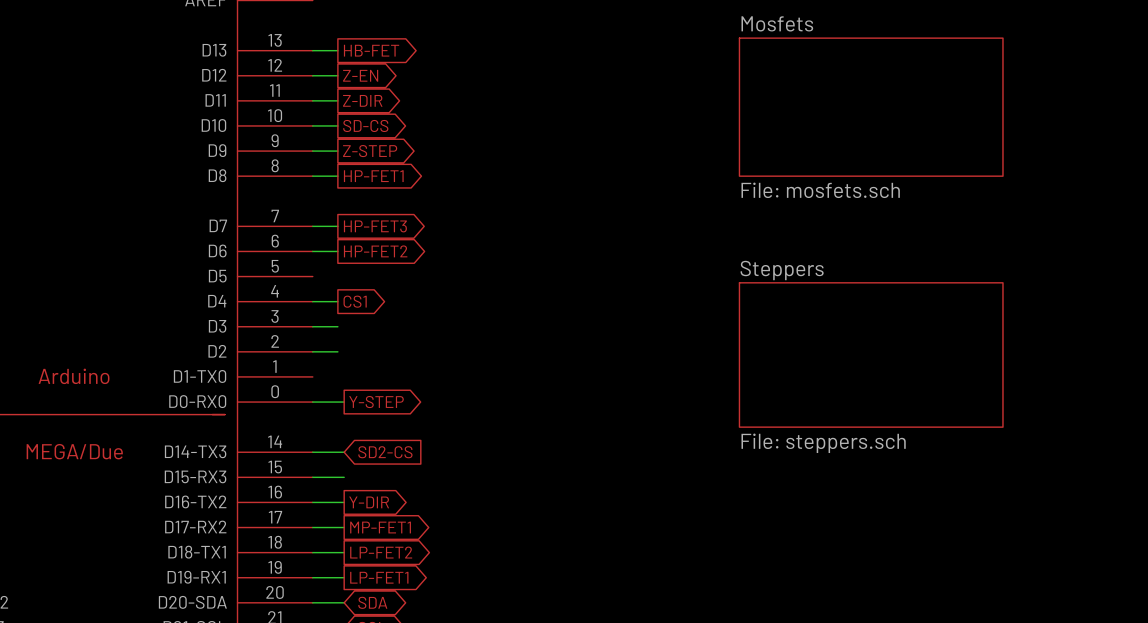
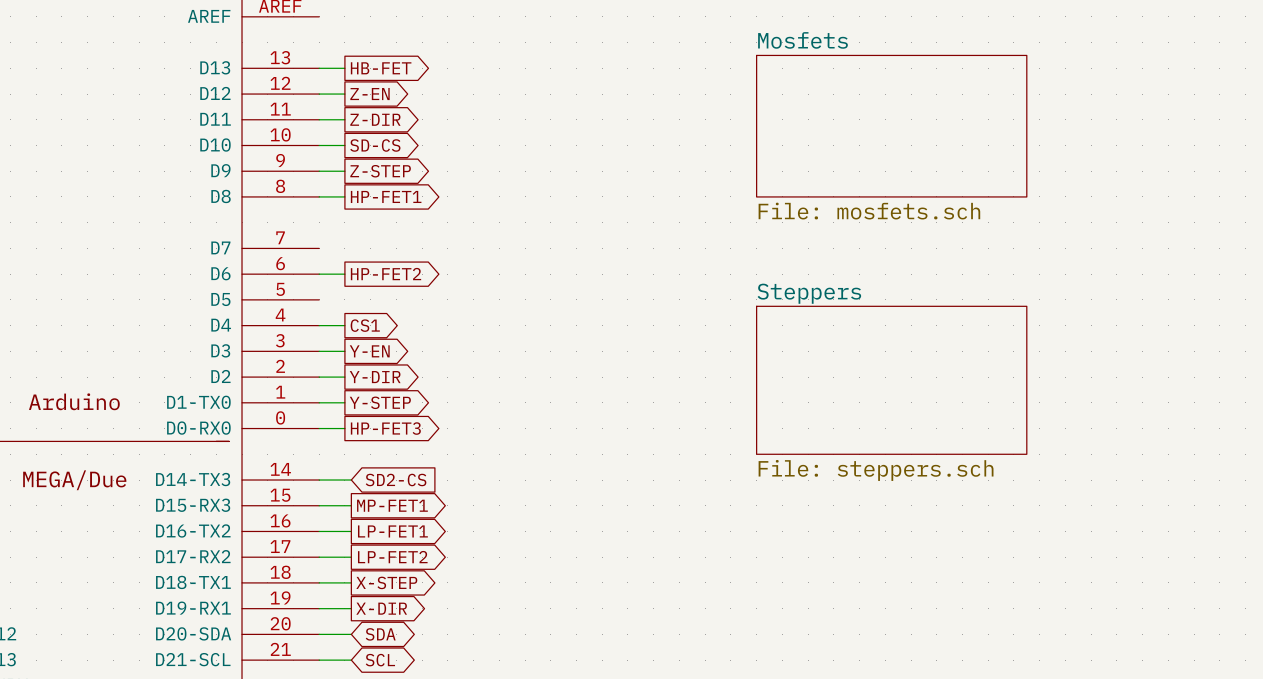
wire: (312, 226) (337, 226) -> (319, 402) (344, 402)
global label: HP-FET3 (375, 226) -> none
global label: none -> Y-EN (369, 351)
global label: none -> Y-DIR (375, 377)
global label: none -> Y-STEP (380, 402)
wire: (337, 402) (344, 402) -> none
global label: Y-STEP (376, 402) -> HP-FET3 (385, 428)
global label: none -> MP-FET1 (392, 505)
global label: Y-DIR (369, 502) -> LP-FET1 (392, 531)
global label: MP-FET1 (380, 527) -> LP-FET2 (392, 557)
global label: LP-FET2 (381, 552) -> X-STEP (386, 582)
global label: LP-FET1 (379, 577) -> X-DIR (381, 608)

